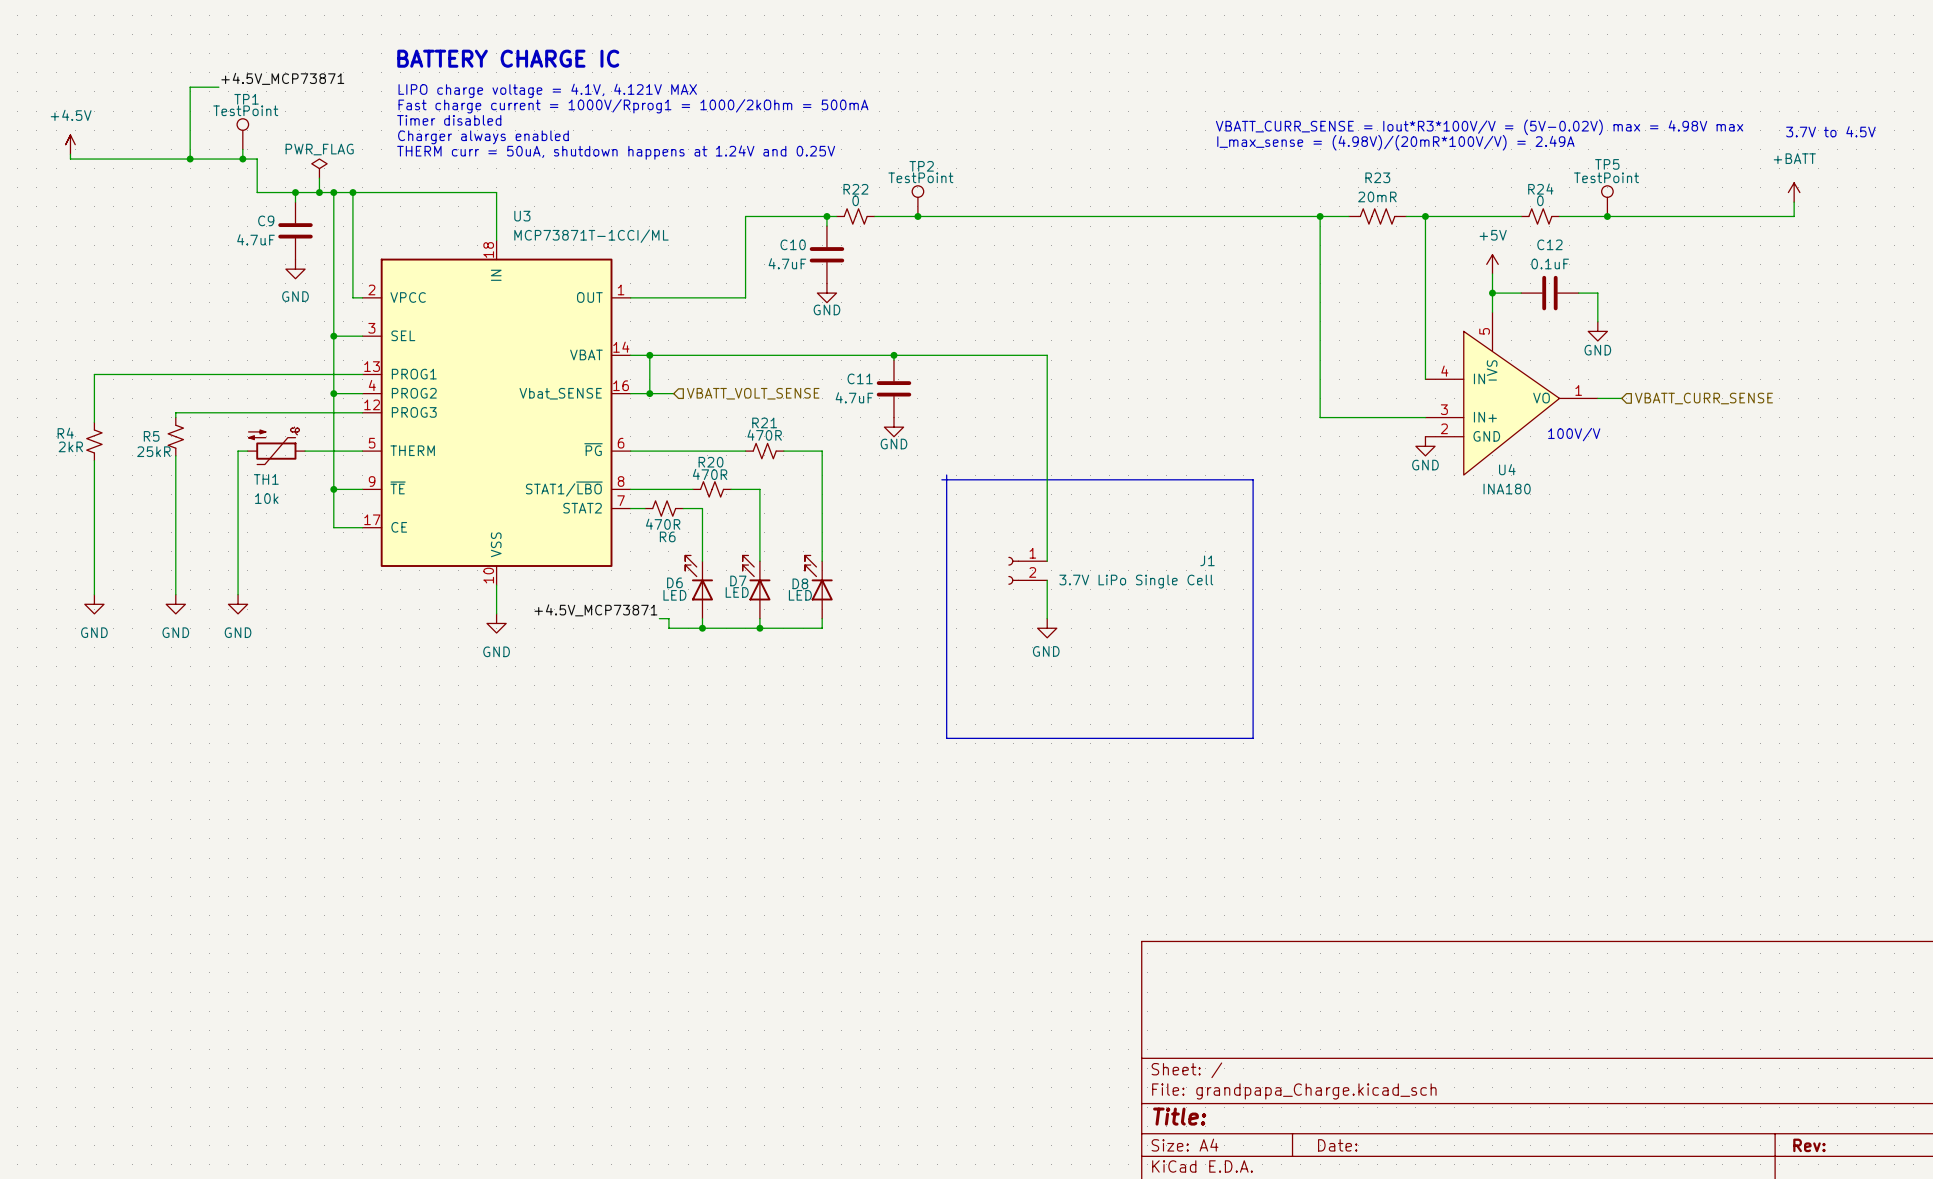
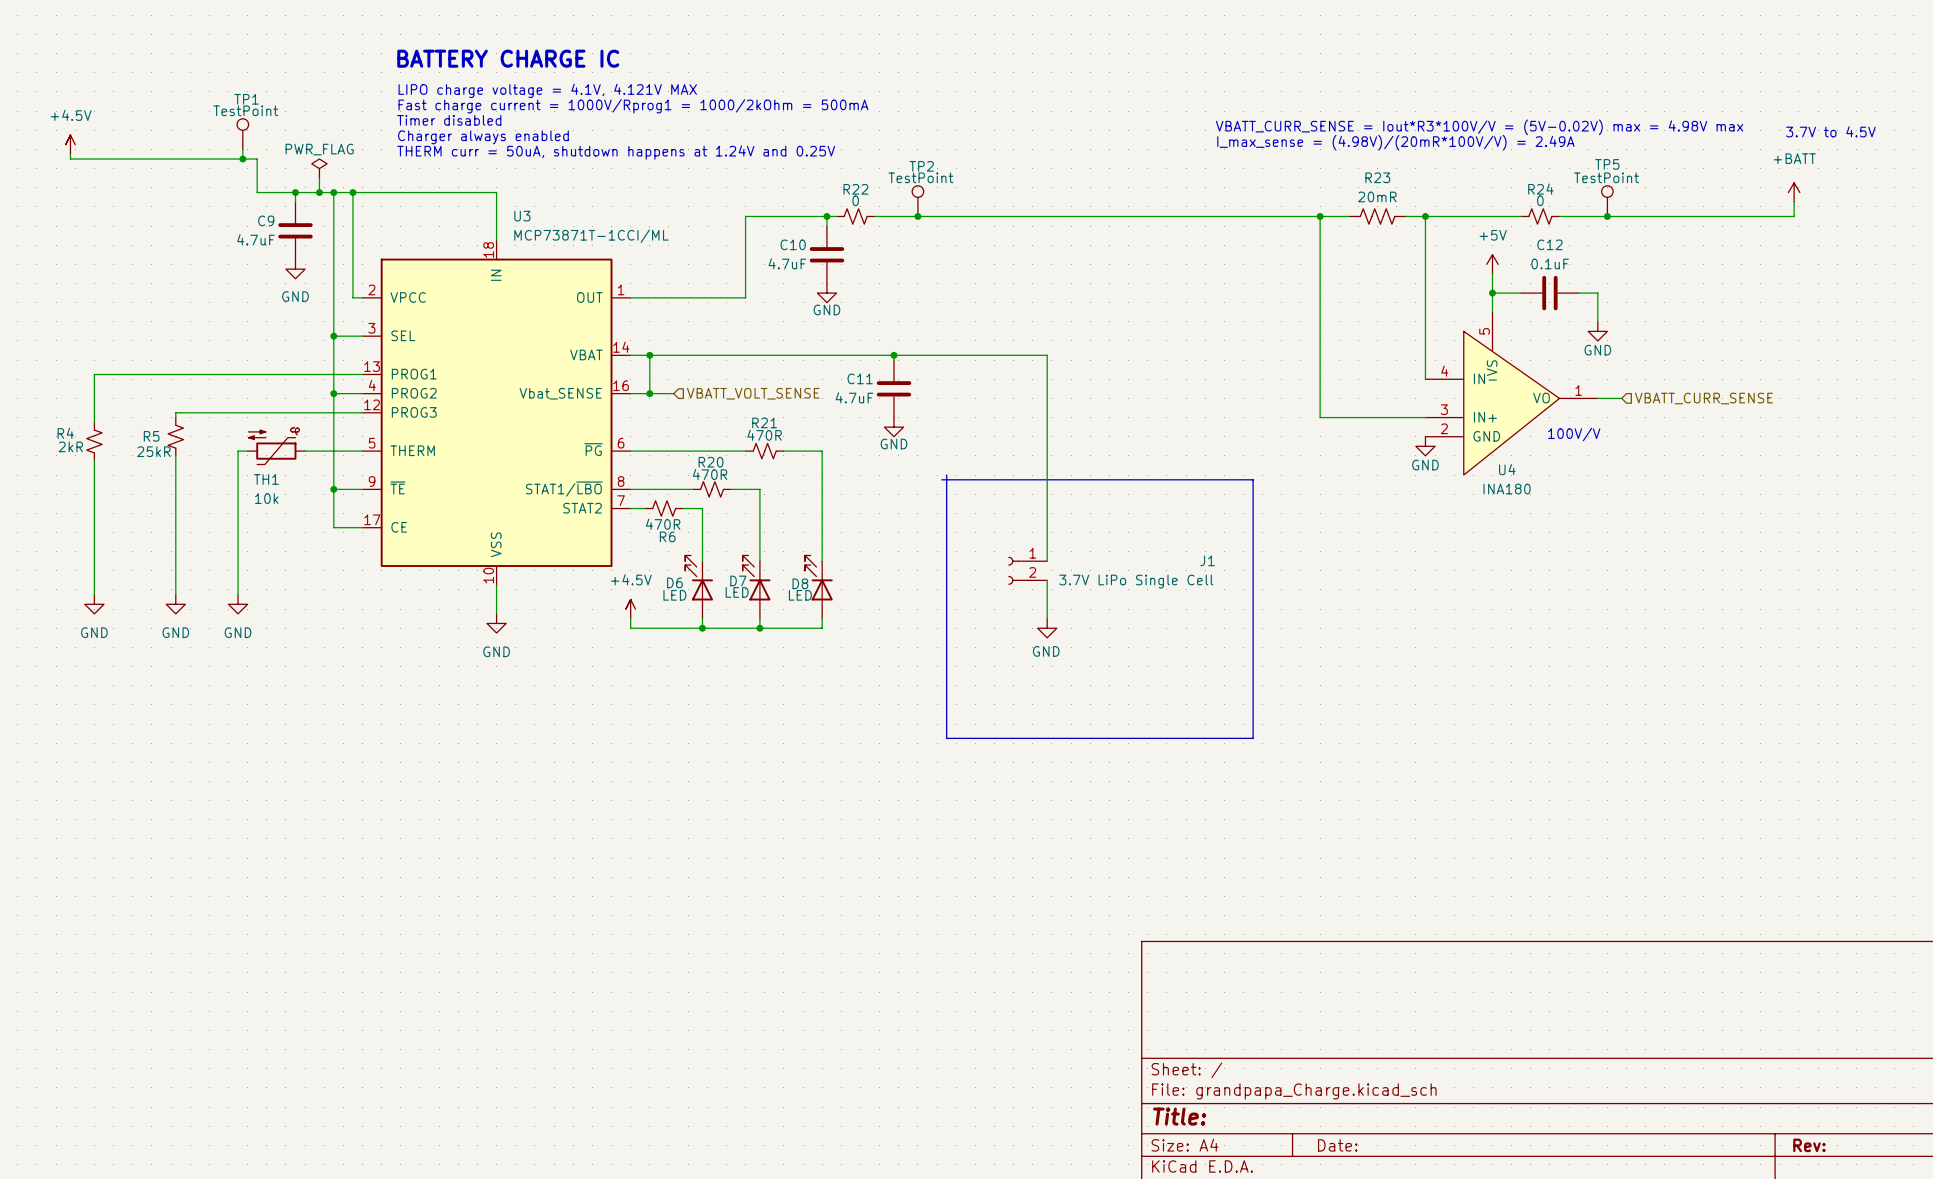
label: +4.5V_MCP73871 (282, 78) -> none
wire: (218, 87) (190, 87) (190, 159) -> none
junction: (190, 159) -> none
power symbol: none -> +4.5V (630, 609)
label: +4.5V_MCP73871 (595, 610) -> none
wire: (659, 618) (668, 618) (668, 628) -> (630, 618) (630, 628) (668, 628)

